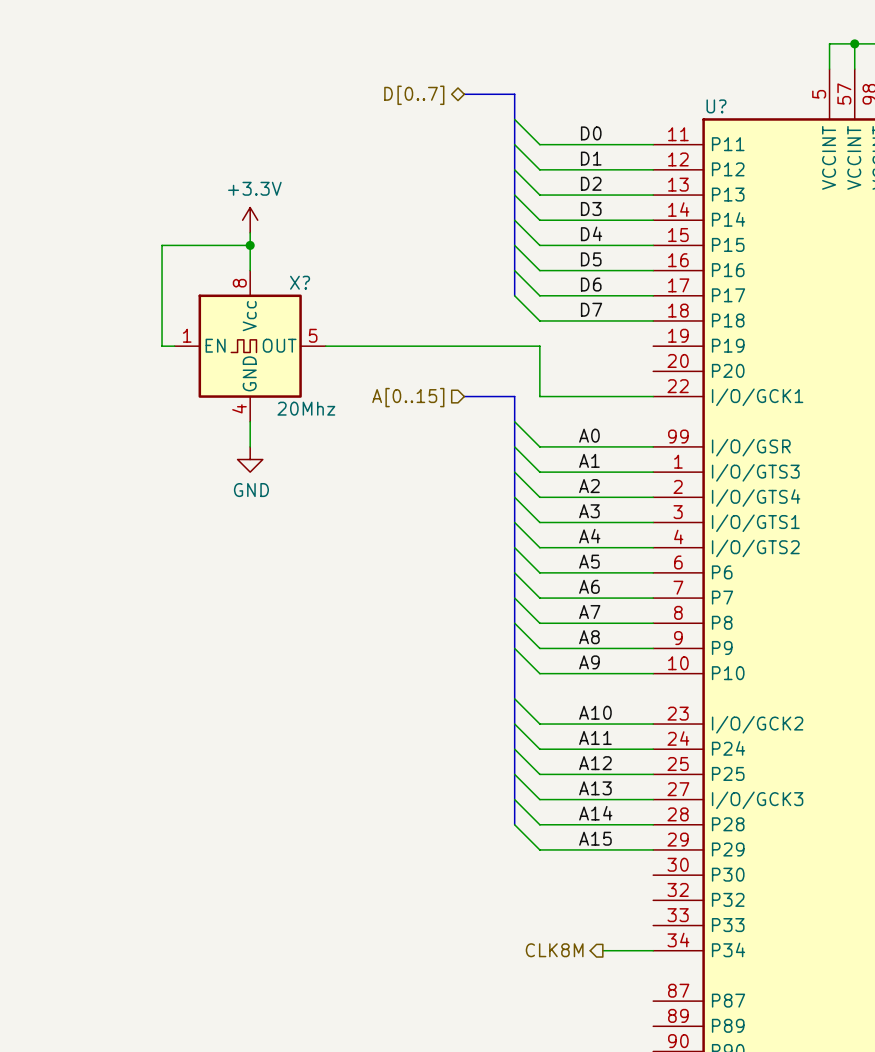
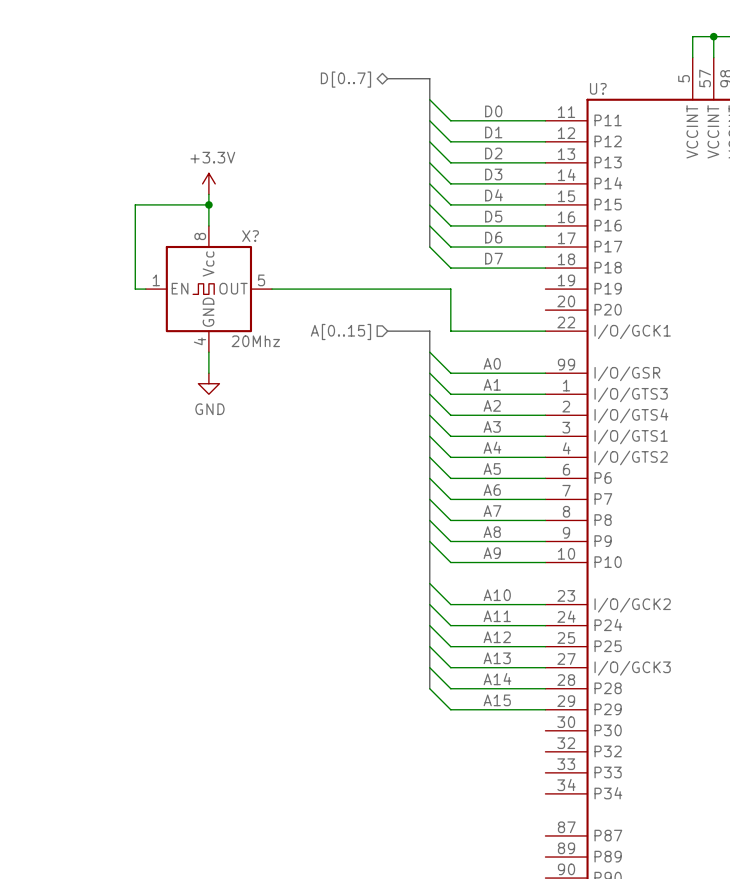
hierarchical label: CLK8M (554, 950) -> none
wire: (602, 950) (653, 950) -> none

